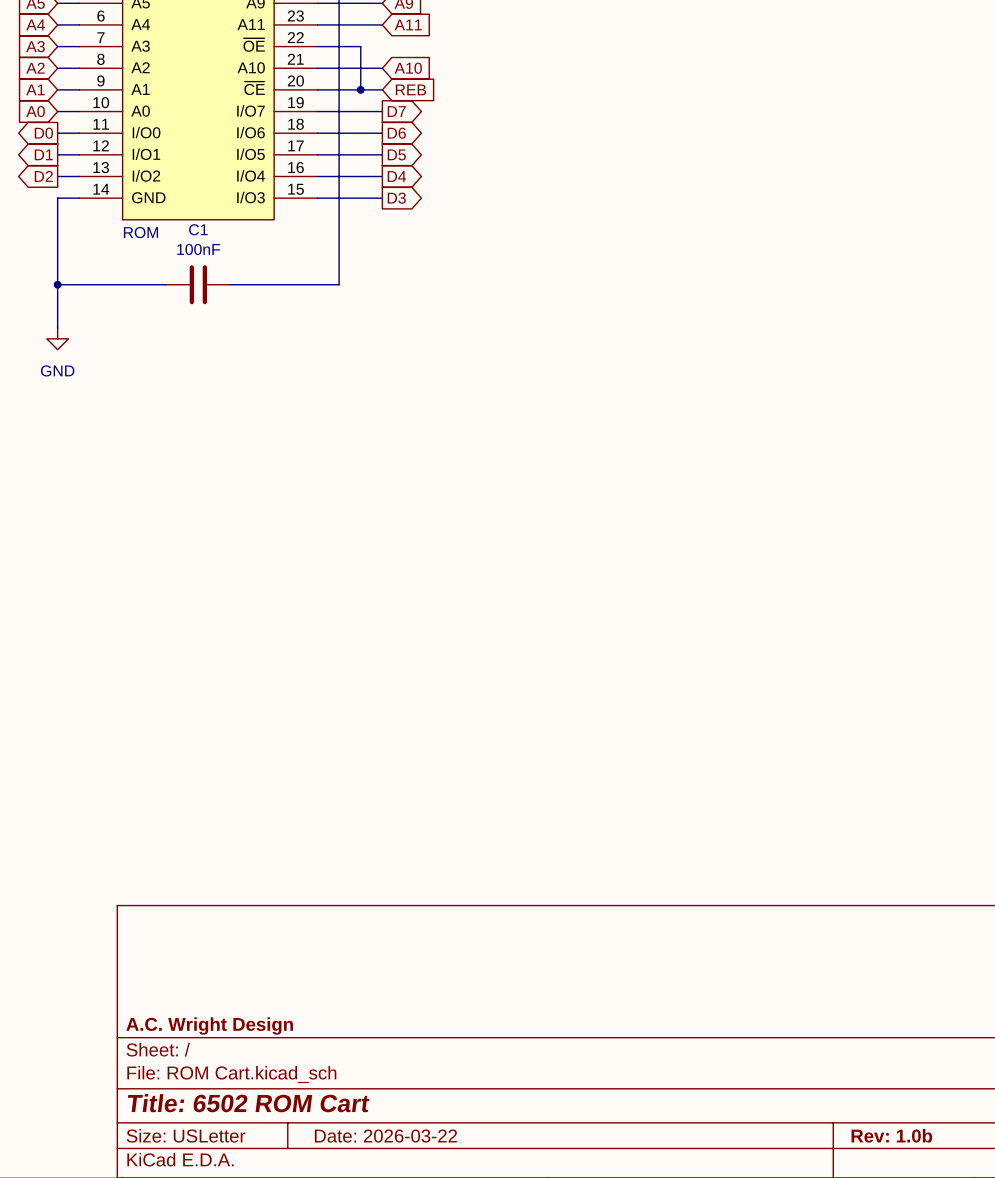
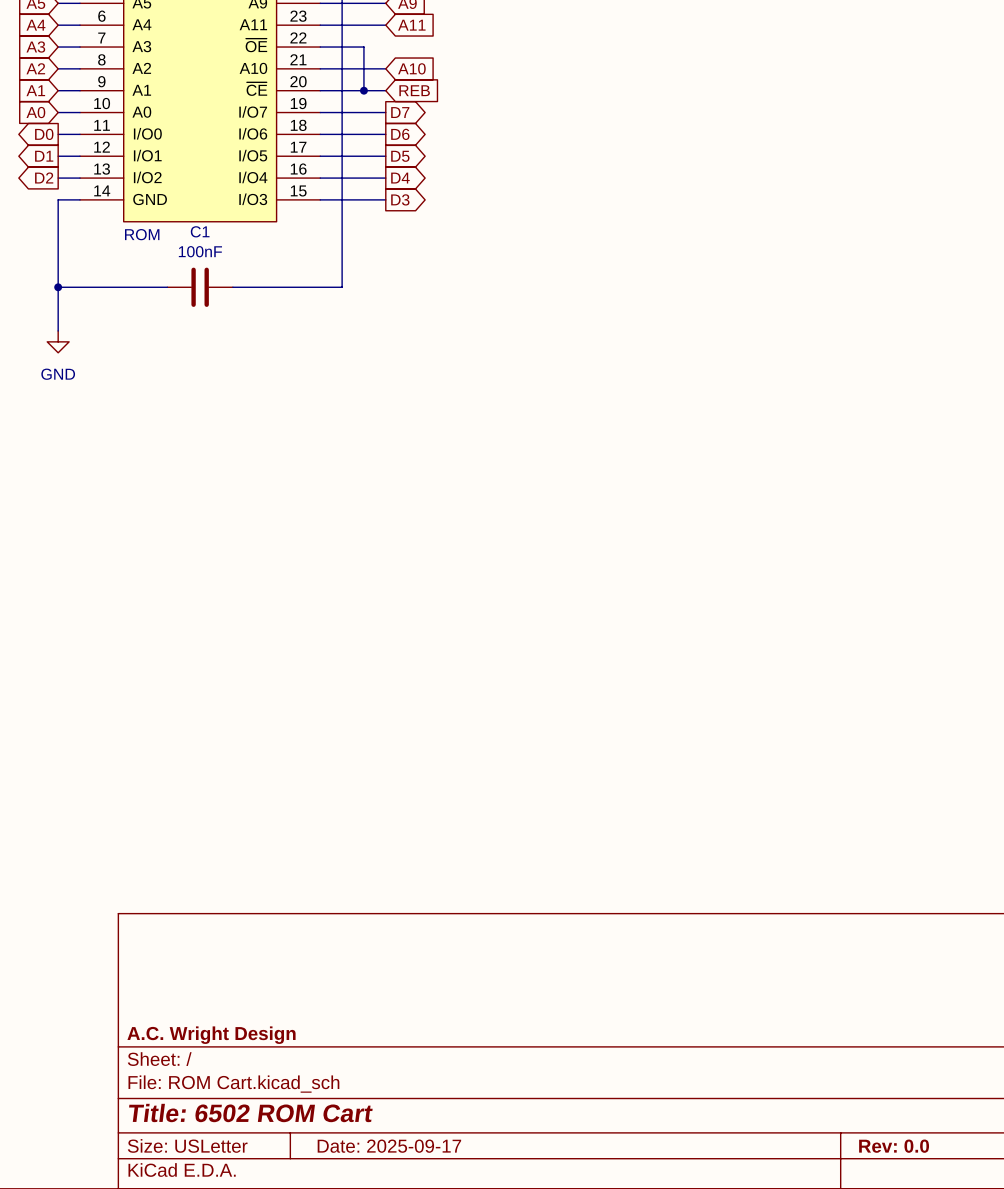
title block: Rev: 1.0b (891, 1135) -> Rev: 0.0 (894, 1146)
title block: Date: 2026-03-22 (385, 1136) -> Date: 2025-09-17 (389, 1146)

